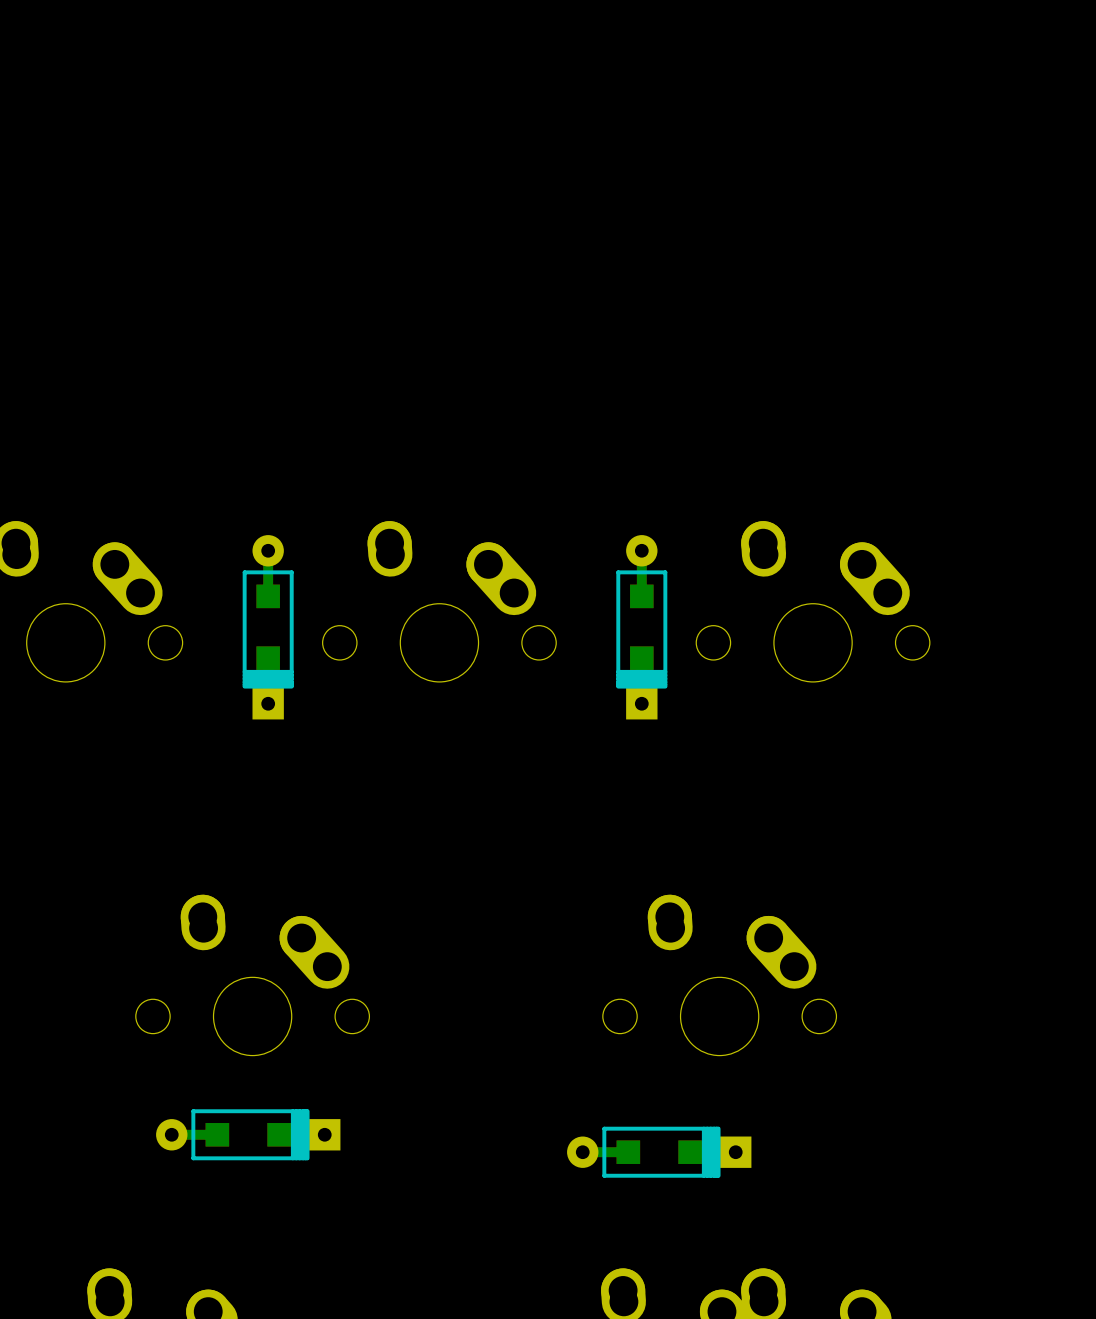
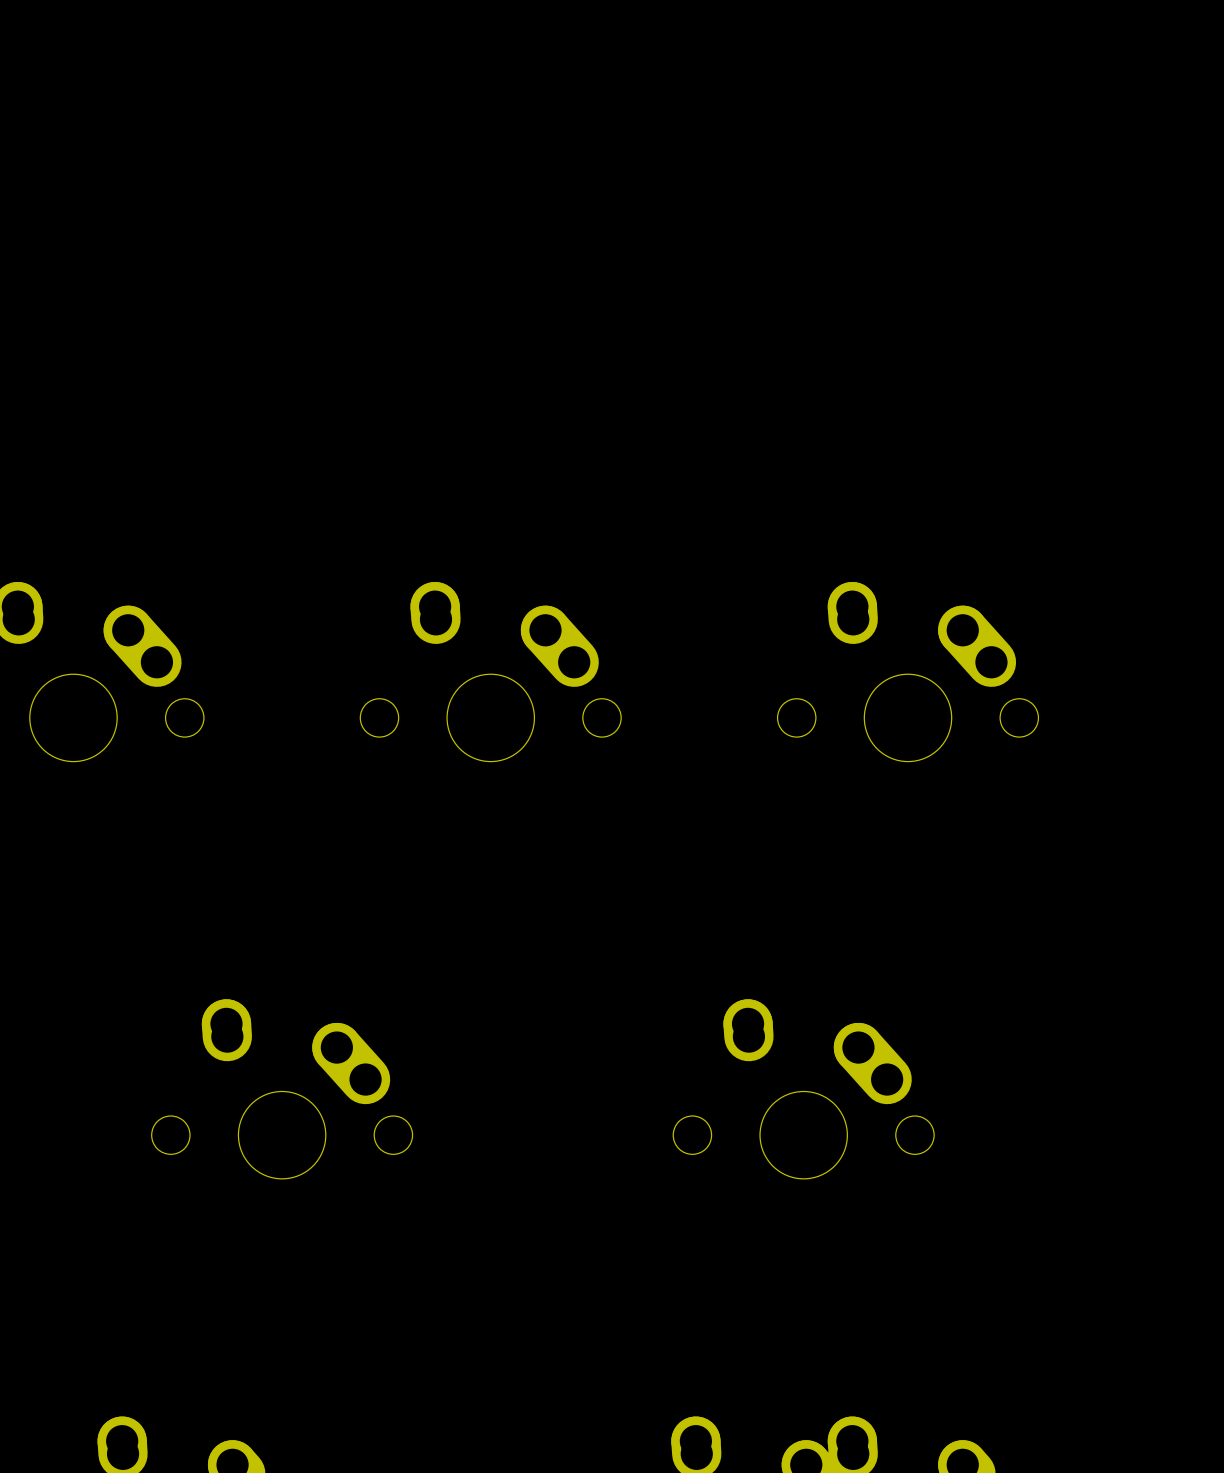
part: (268, 627) -> none
part: (641, 627) -> none
part: (248, 1134) -> none
part: (659, 1152) -> none

